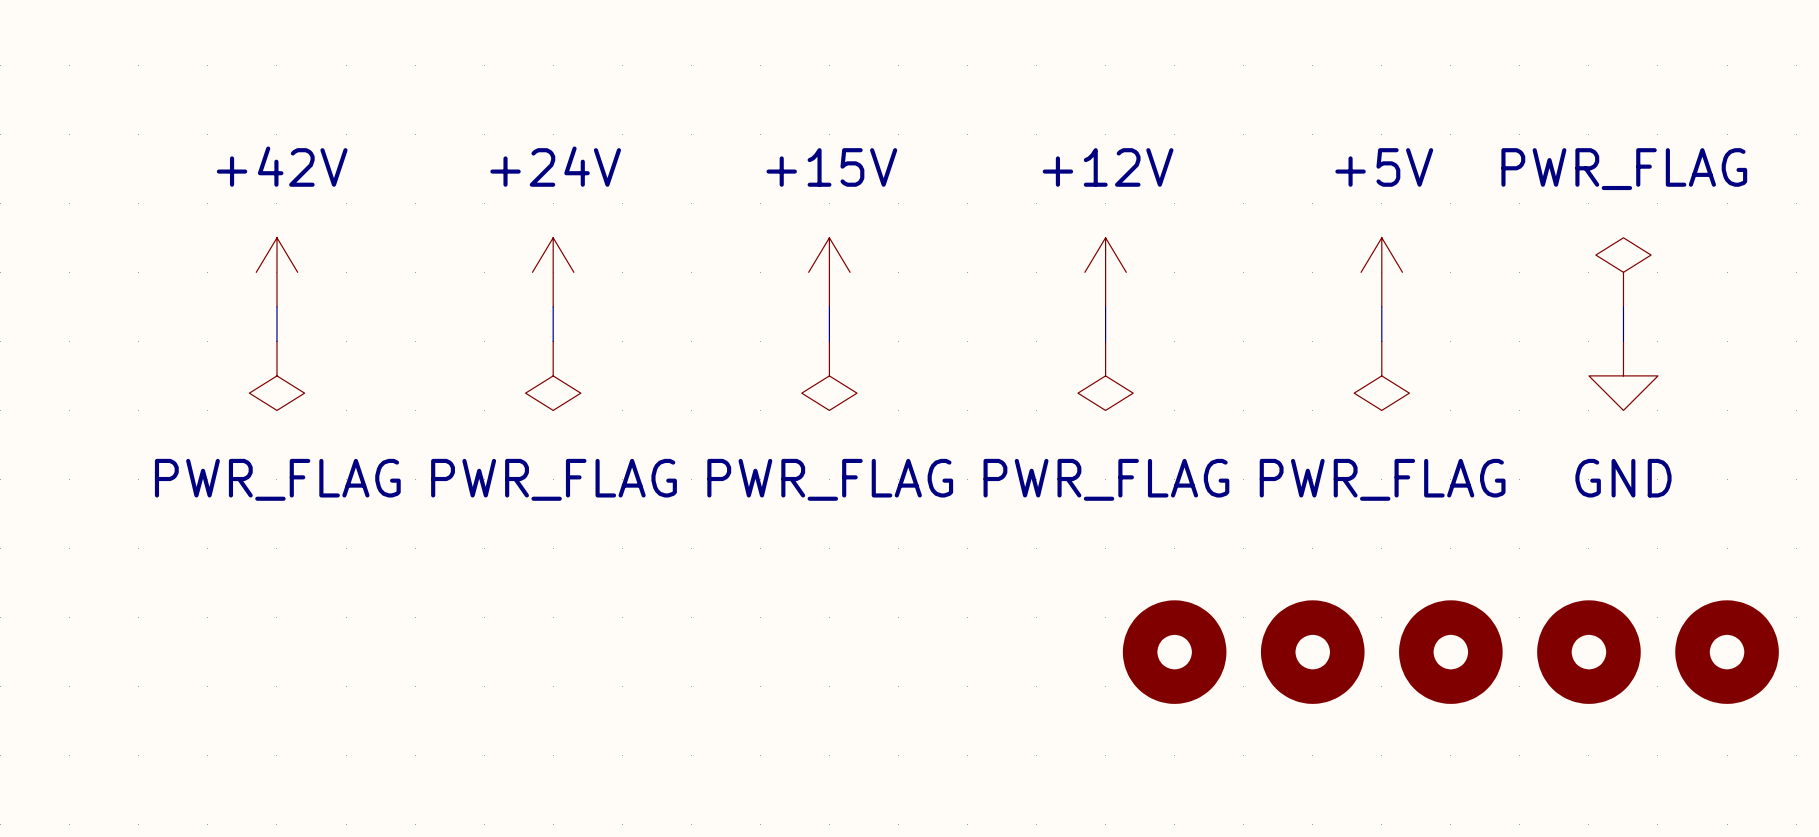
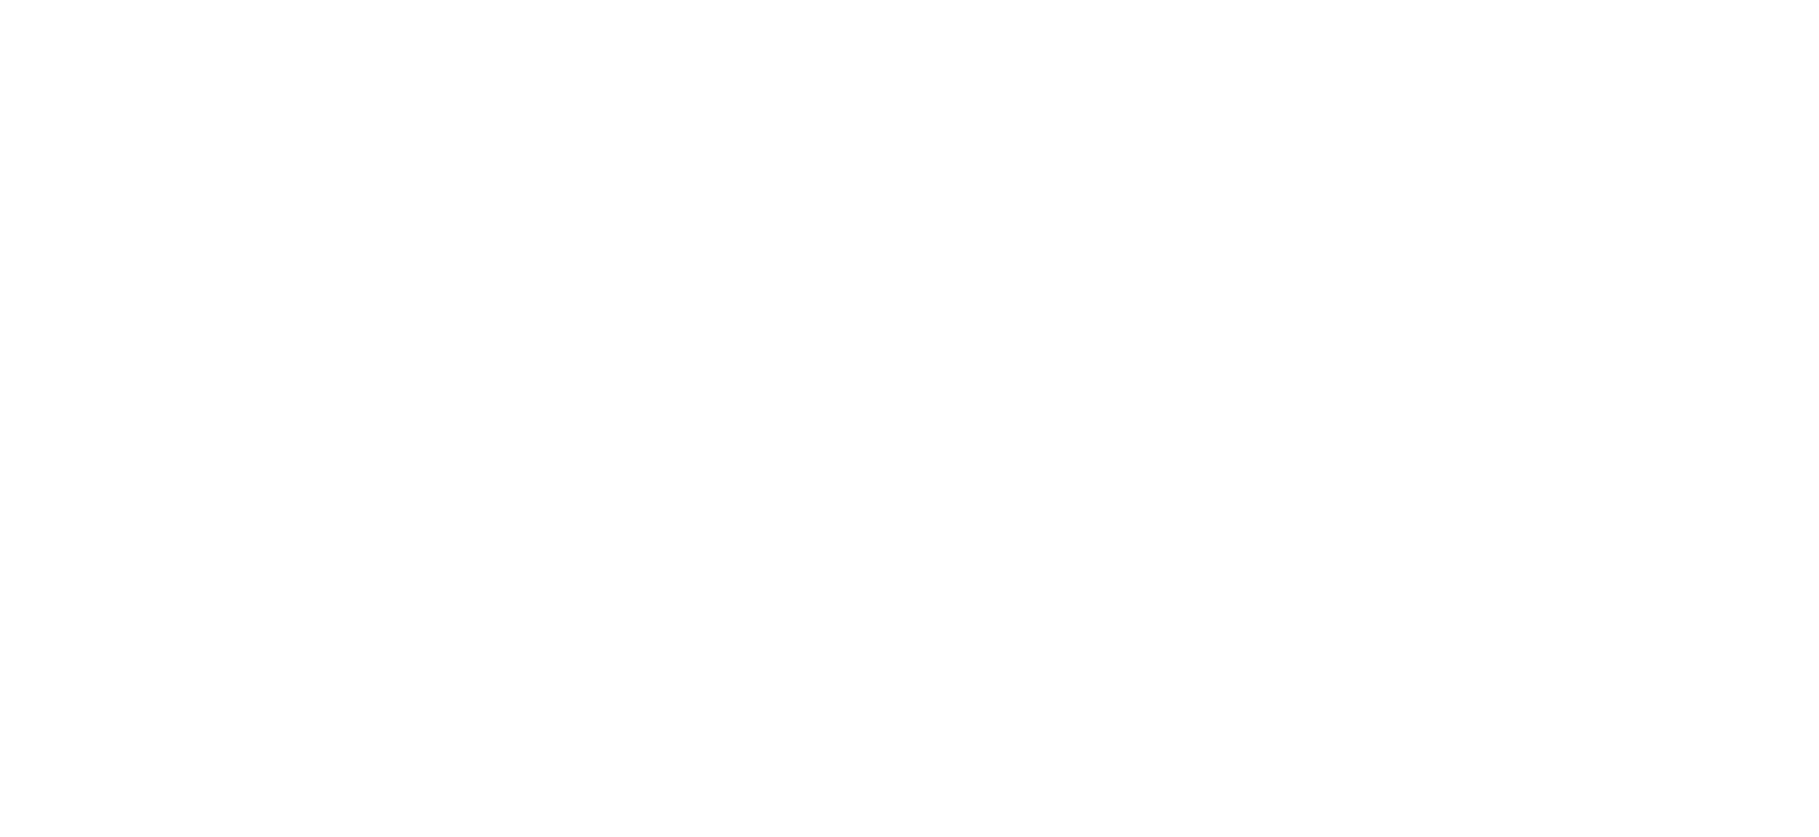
power symbol: +42V (276, 272) -> none
power symbol: +24V (553, 272) -> none
power symbol: +15V (829, 272) -> none
power symbol: +12V (1105, 272) -> none
power symbol: +5V (1381, 272) -> none
power symbol: PWR_FLAG (1623, 272) -> none
wire: (276, 306) (276, 341) -> none
wire: (553, 306) (553, 341) -> none
wire: (829, 306) (829, 341) -> none
wire: (1105, 306) (1105, 341) -> none
wire: (1381, 306) (1381, 341) -> none
wire: (1623, 306) (1623, 341) -> none
power symbol: PWR_FLAG (276, 375) -> none
power symbol: PWR_FLAG (553, 375) -> none
power symbol: PWR_FLAG (829, 375) -> none
power symbol: PWR_FLAG (1105, 375) -> none
power symbol: PWR_FLAG (1381, 375) -> none
power symbol: GND (1623, 375) -> none
part: (1174, 652) -> none
part: (1312, 652) -> none
part: (1450, 652) -> none
part: (1588, 652) -> none
part: (1727, 652) -> none

